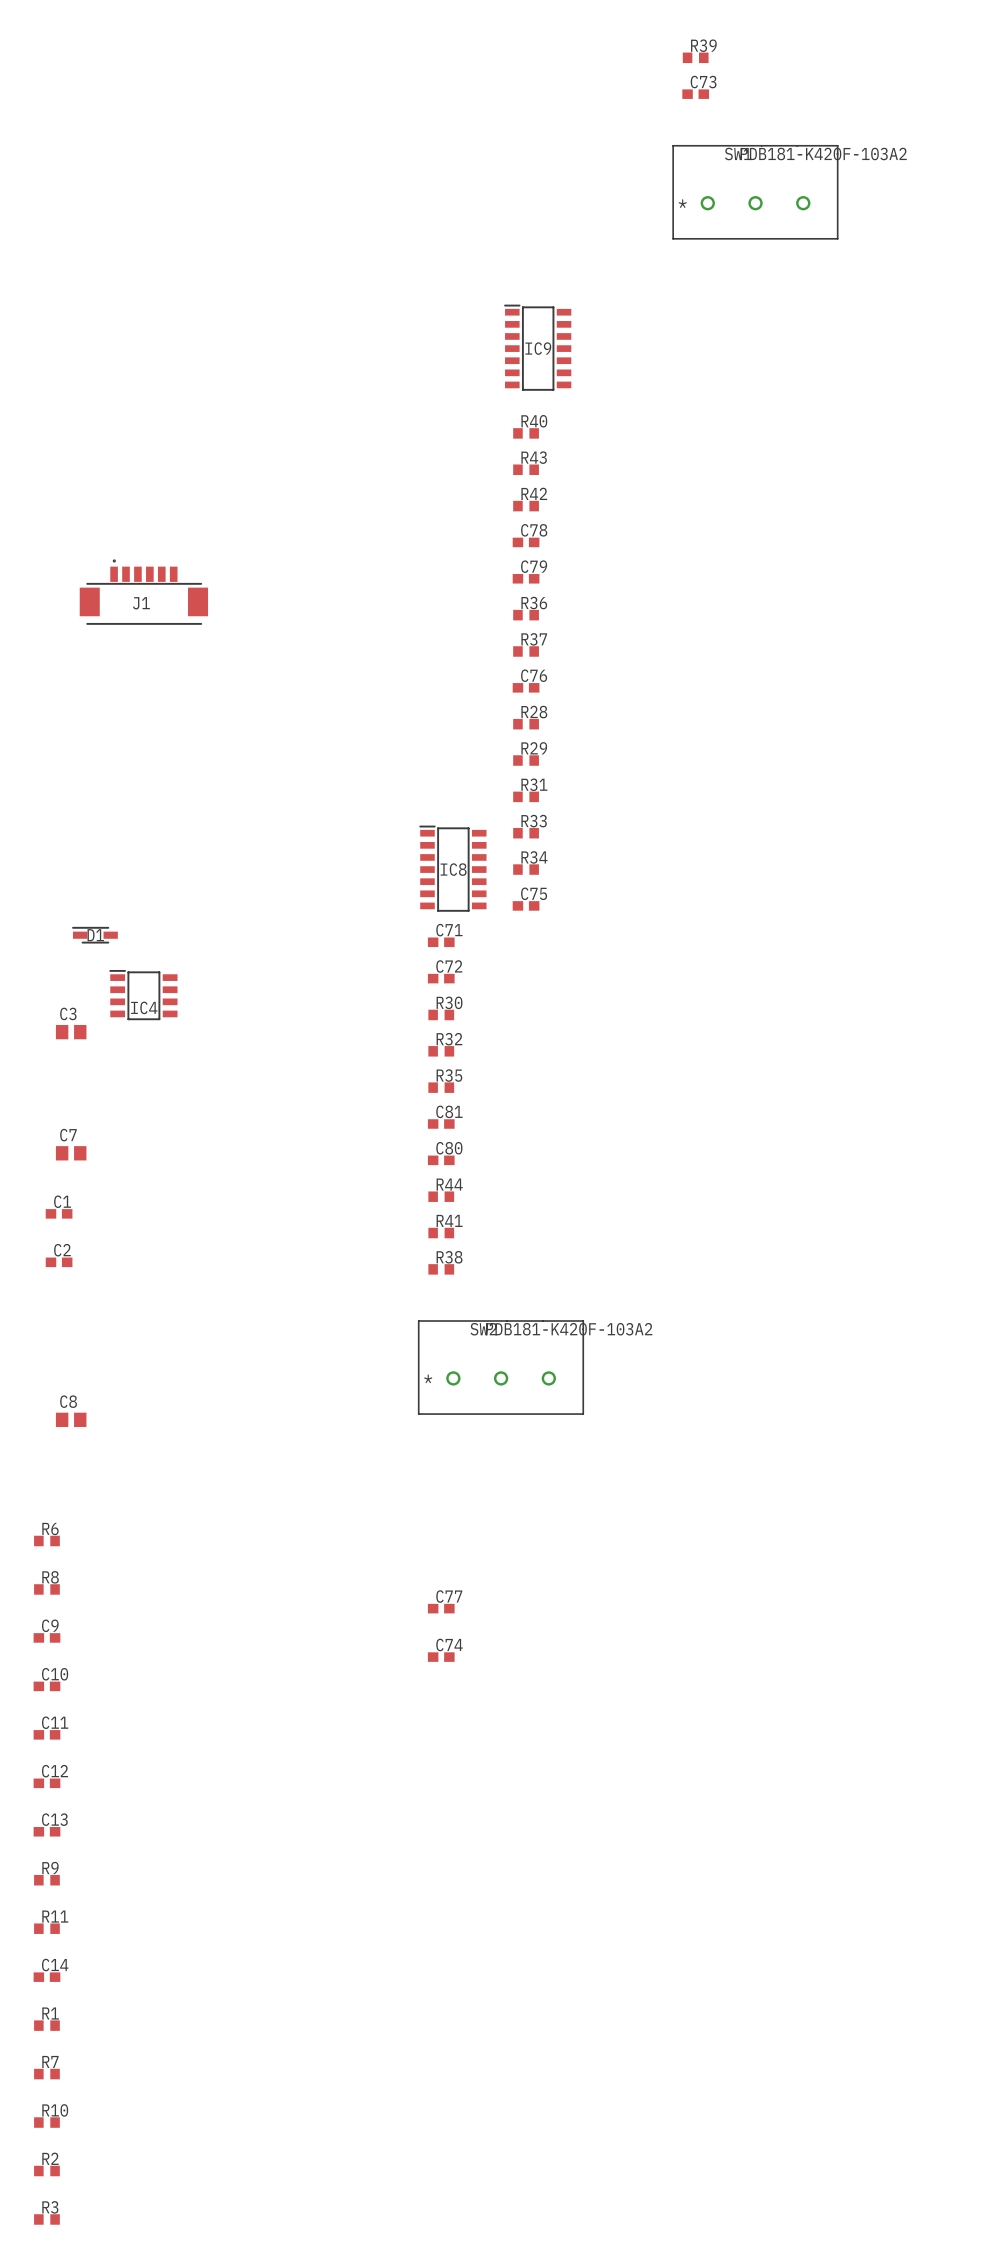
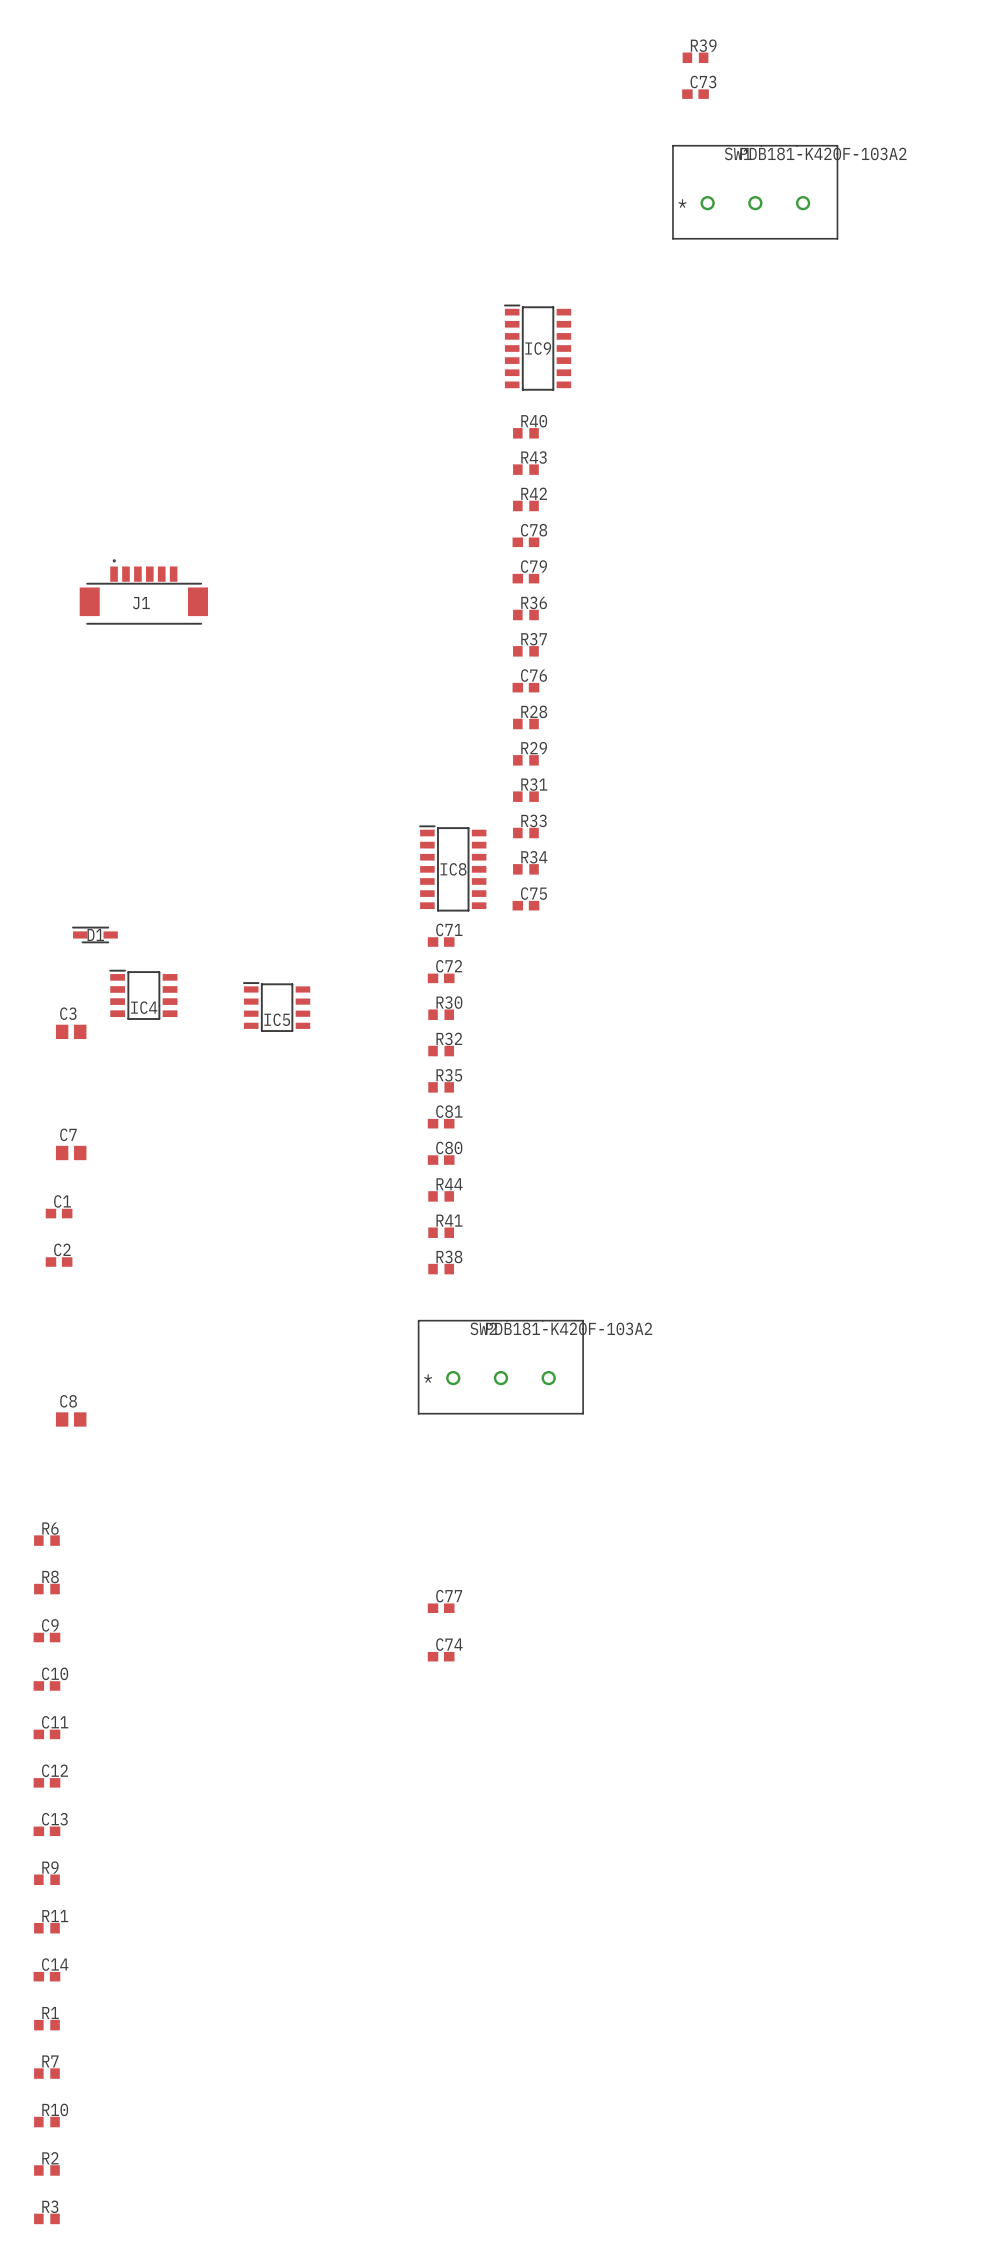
IC5: none -> (276, 1007)

